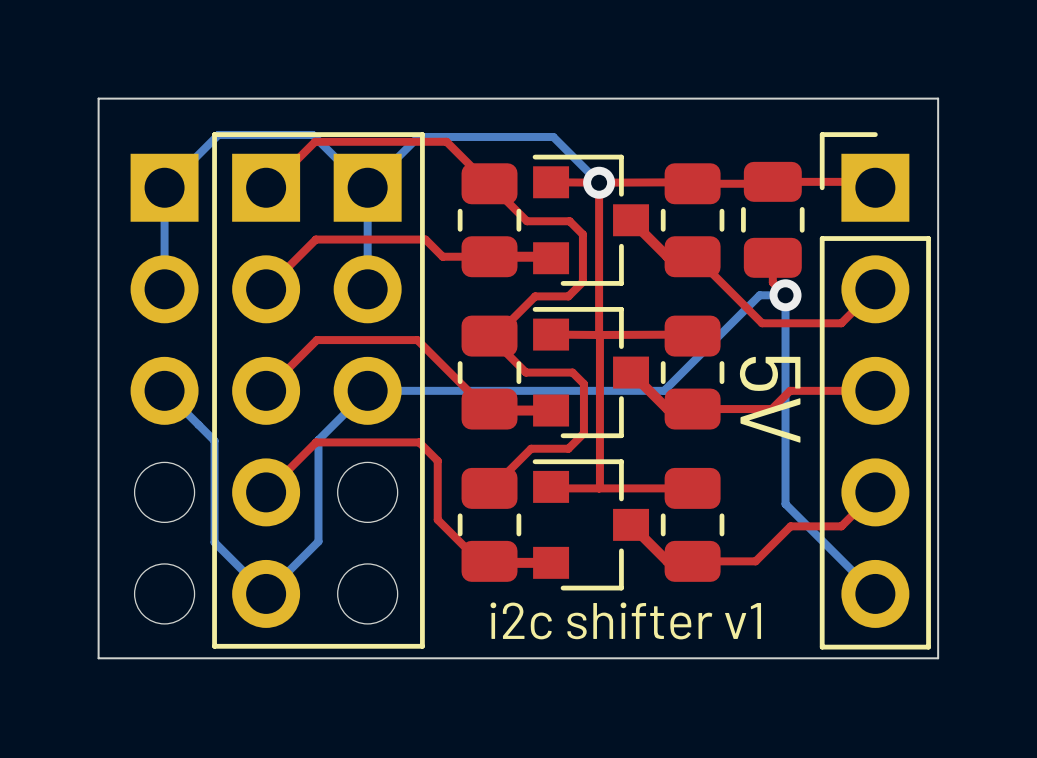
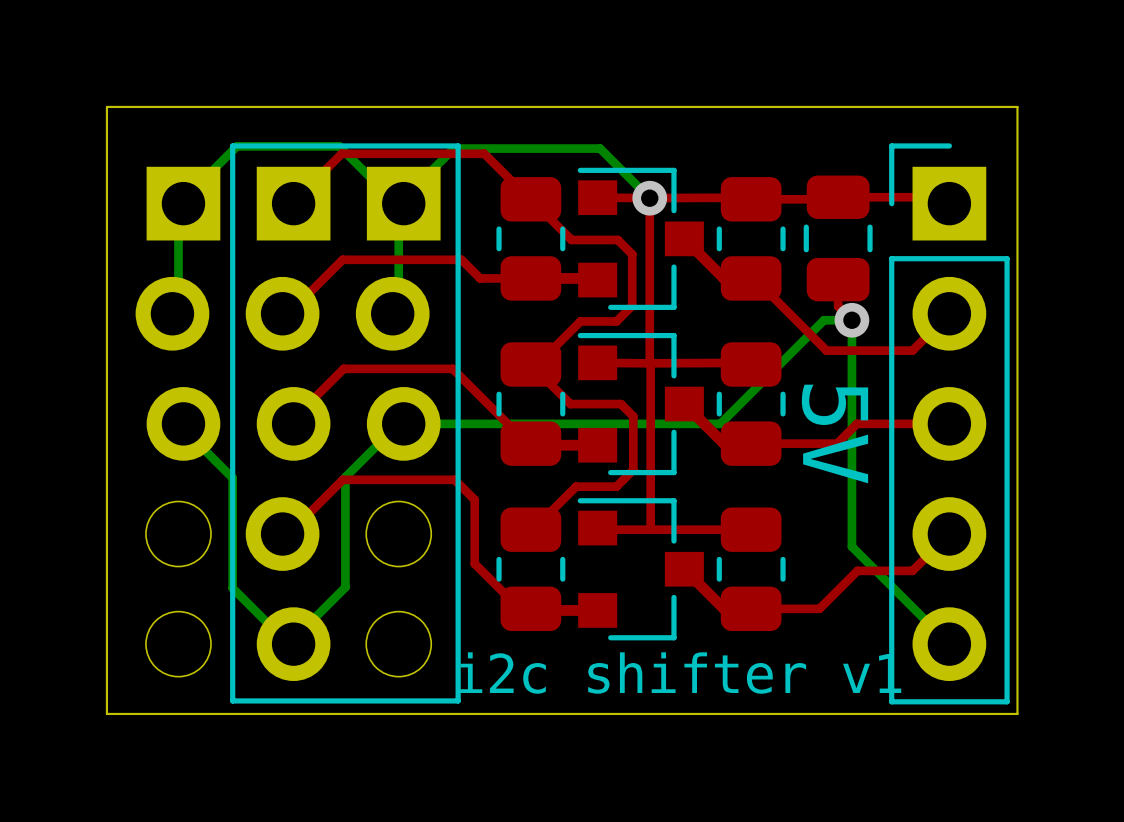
part footprint: [130, 153, 199, 425] -> [135, 166, 221, 461]
part footprint: [232, 153, 301, 628] -> [245, 166, 331, 682]
part footprint: [333, 153, 402, 425] -> [355, 166, 441, 461]

